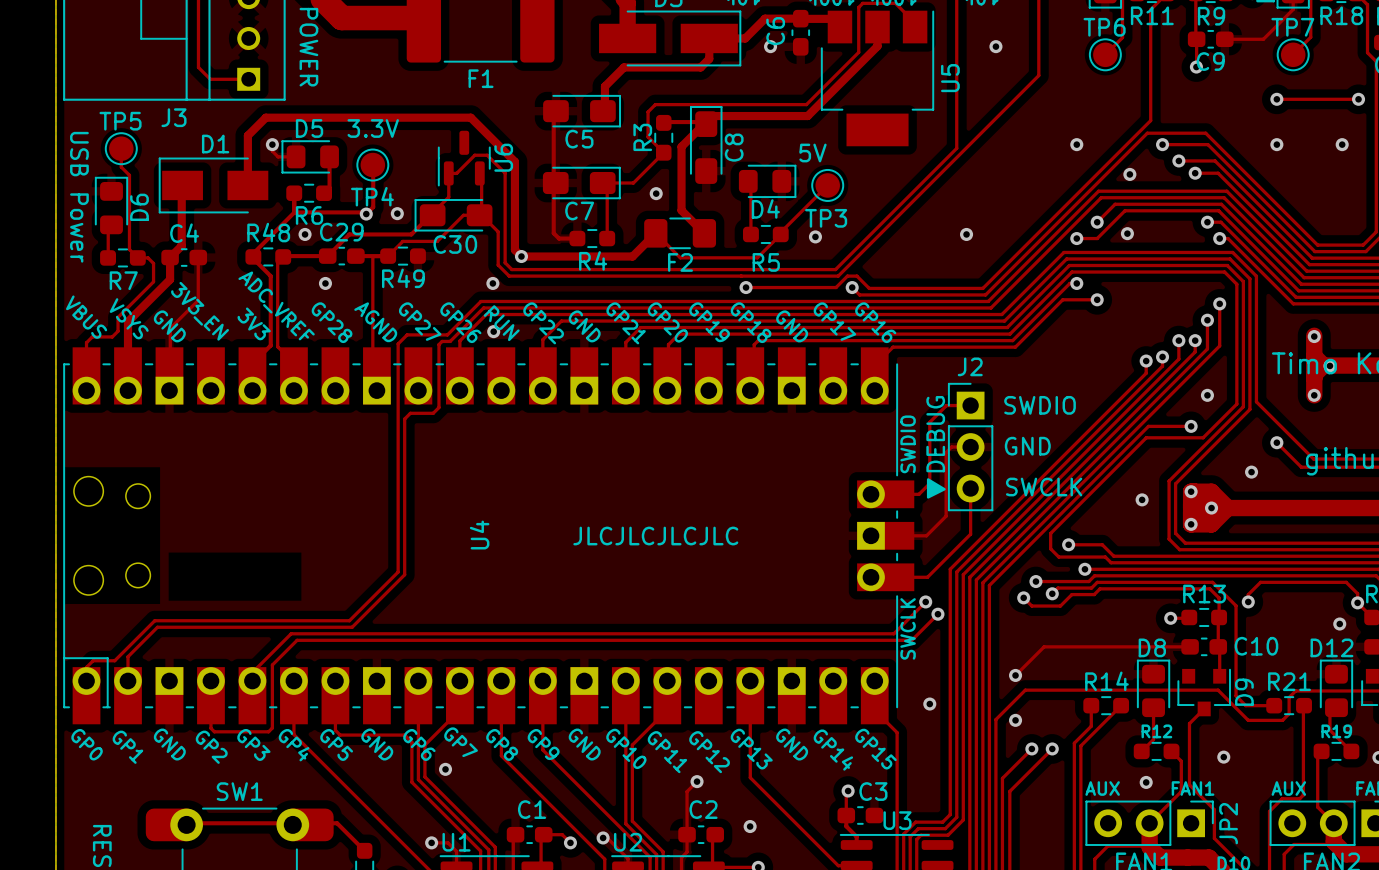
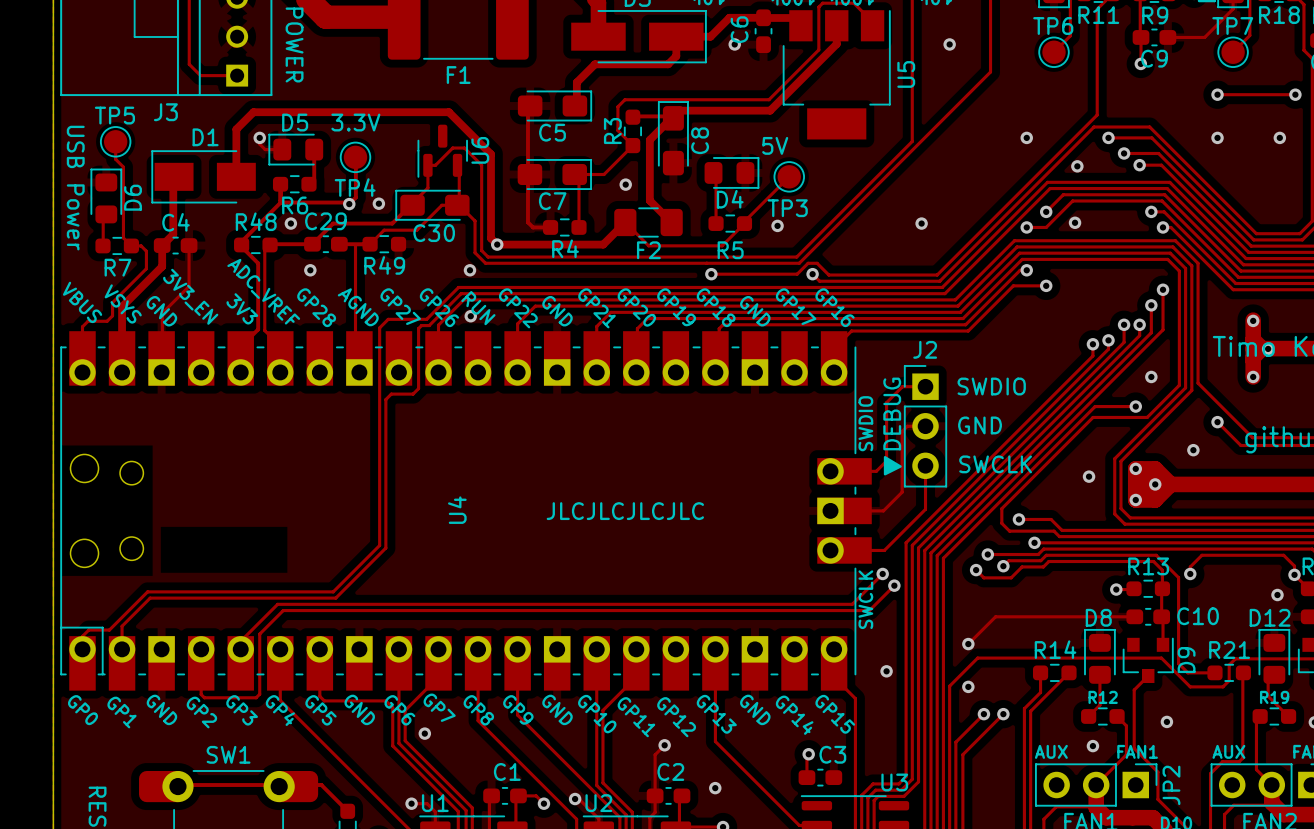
track: (846, 815) (846, 826) (856, 836) (856, 844) -> none
U3 name position: U3 (897, 820) -> U3 (894, 782)

